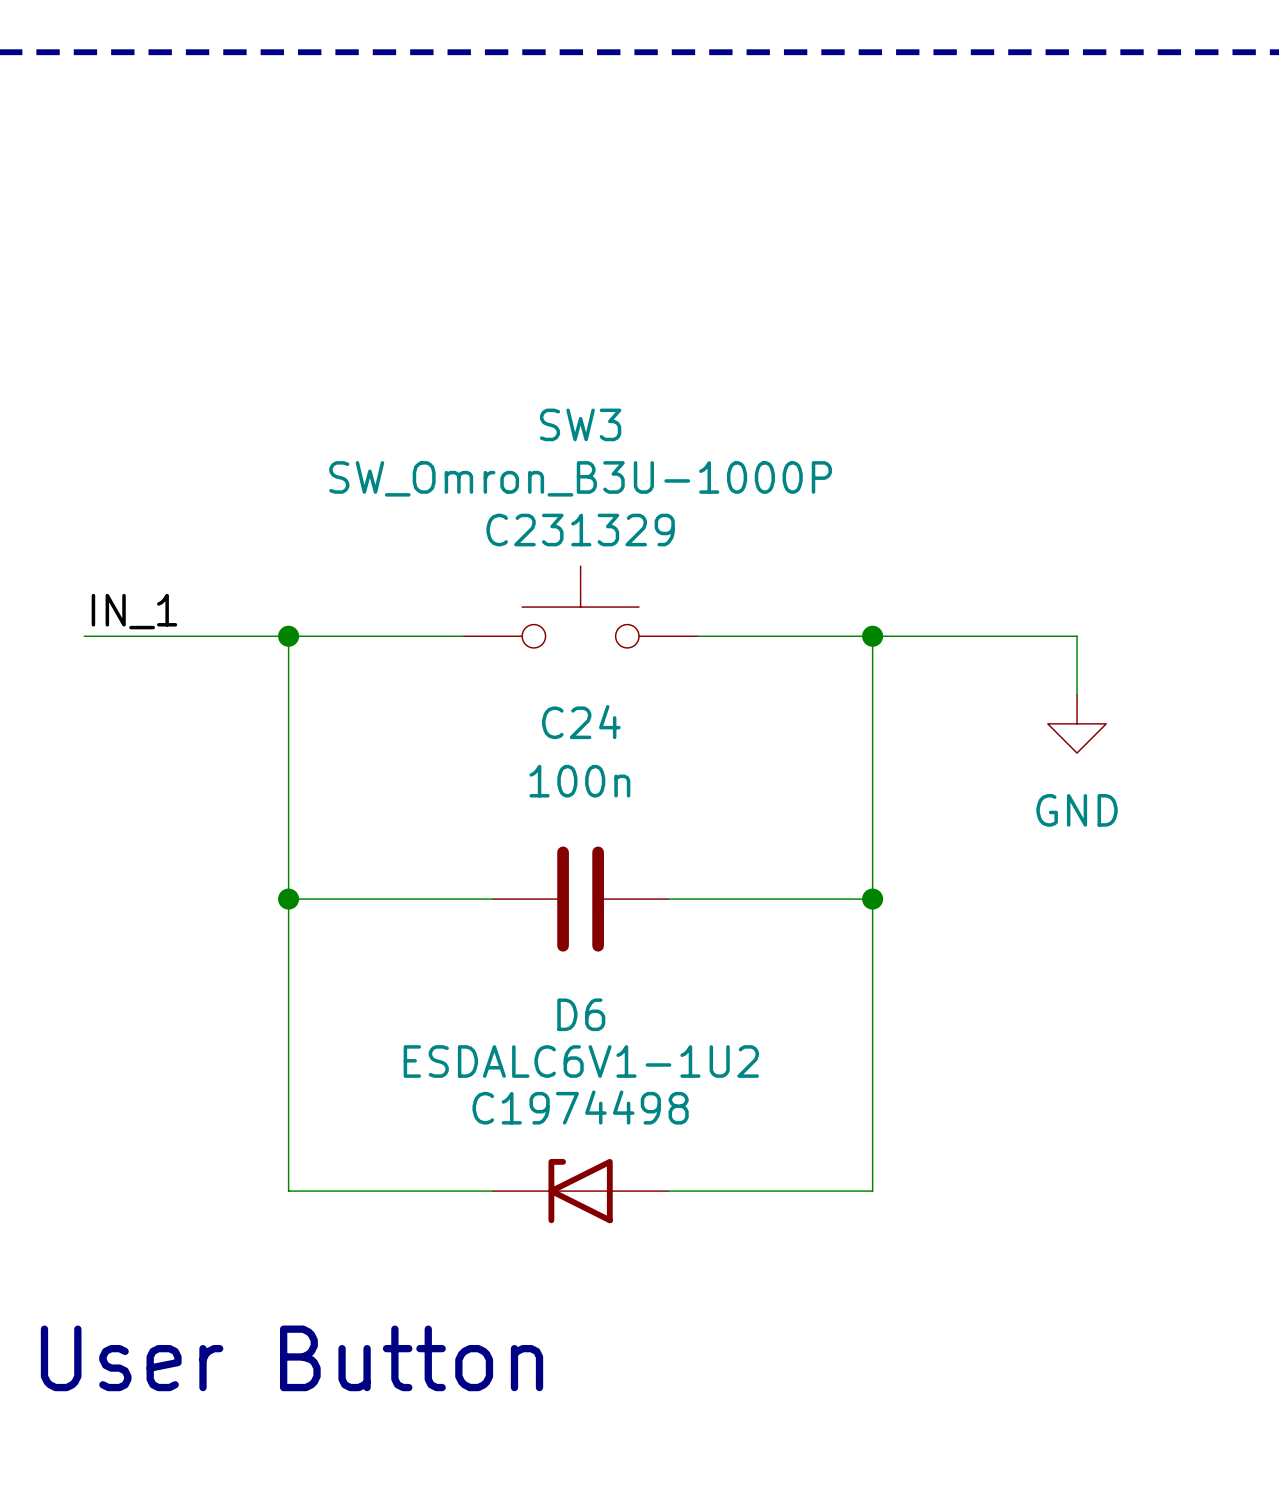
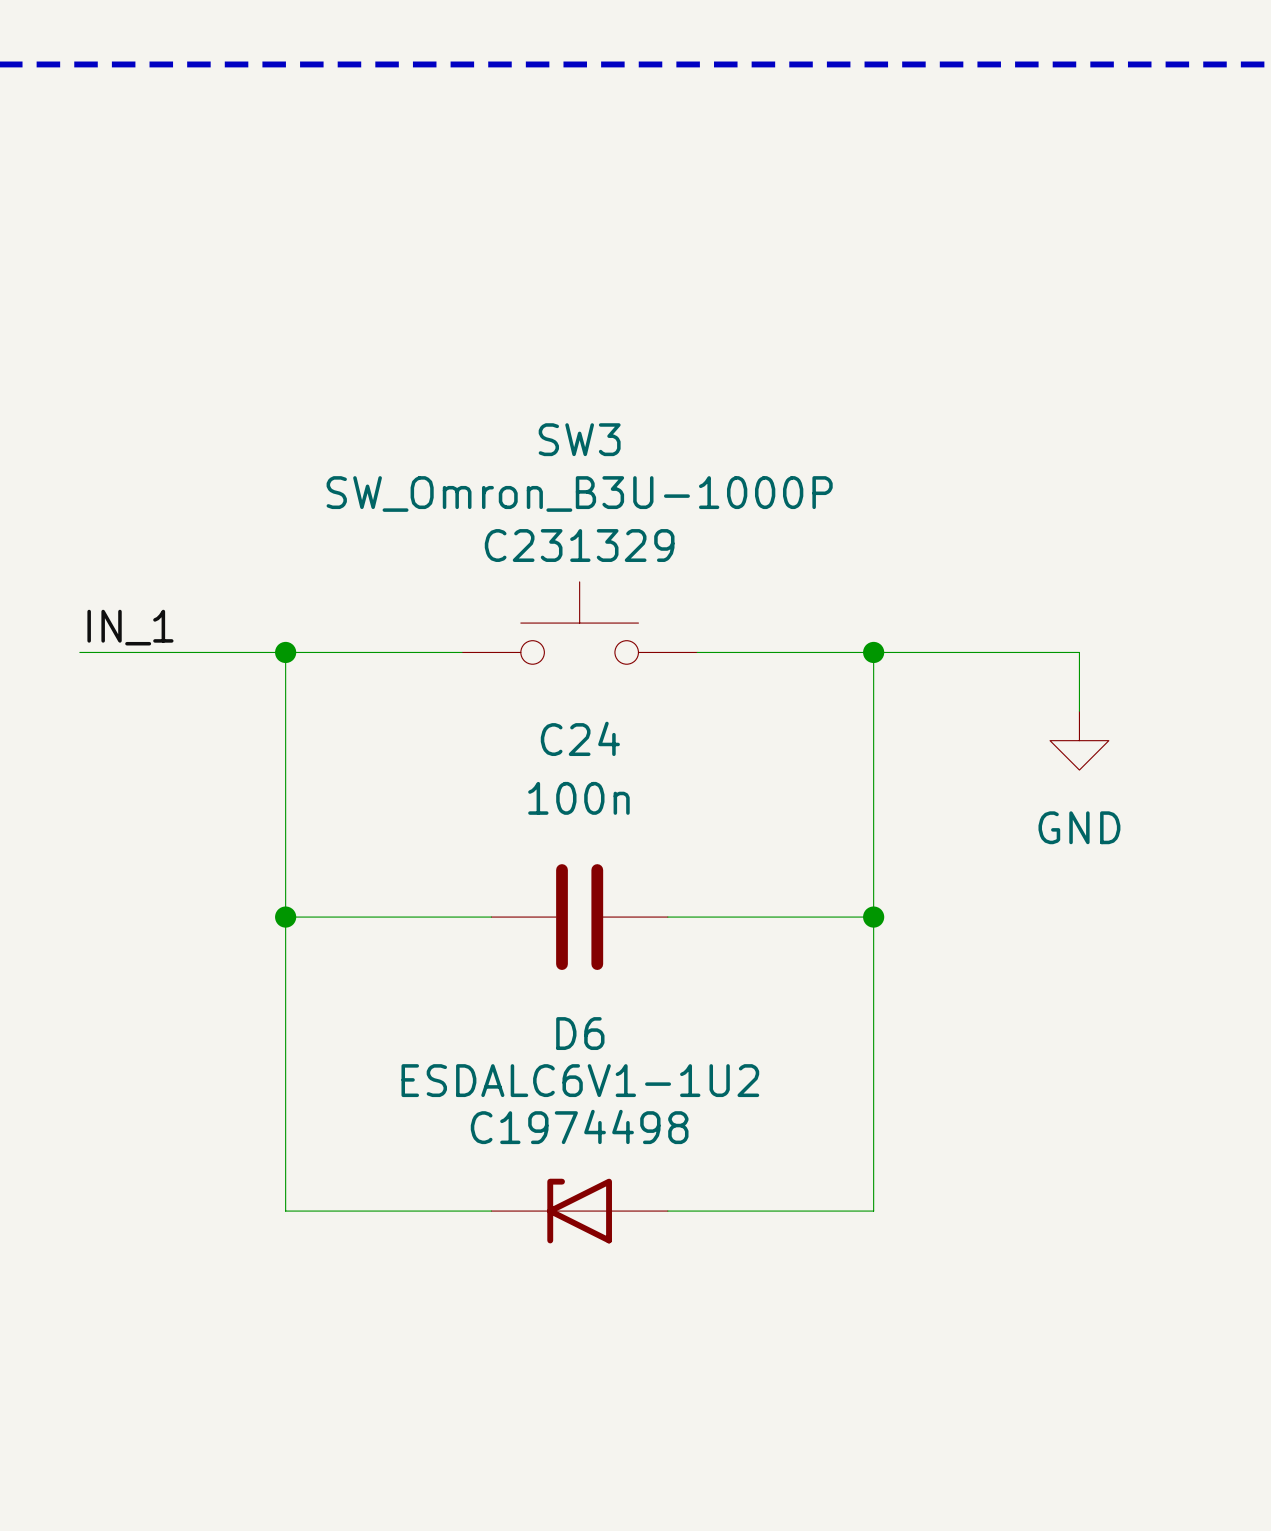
text: User Button (291, 1358) -> none

